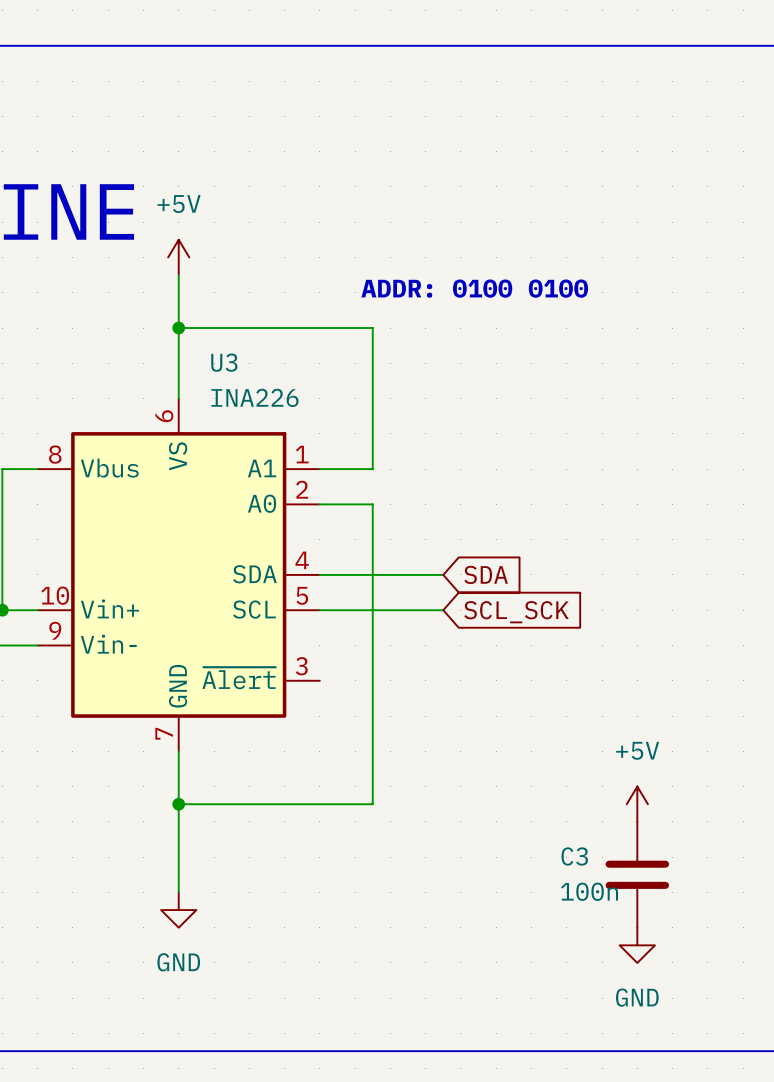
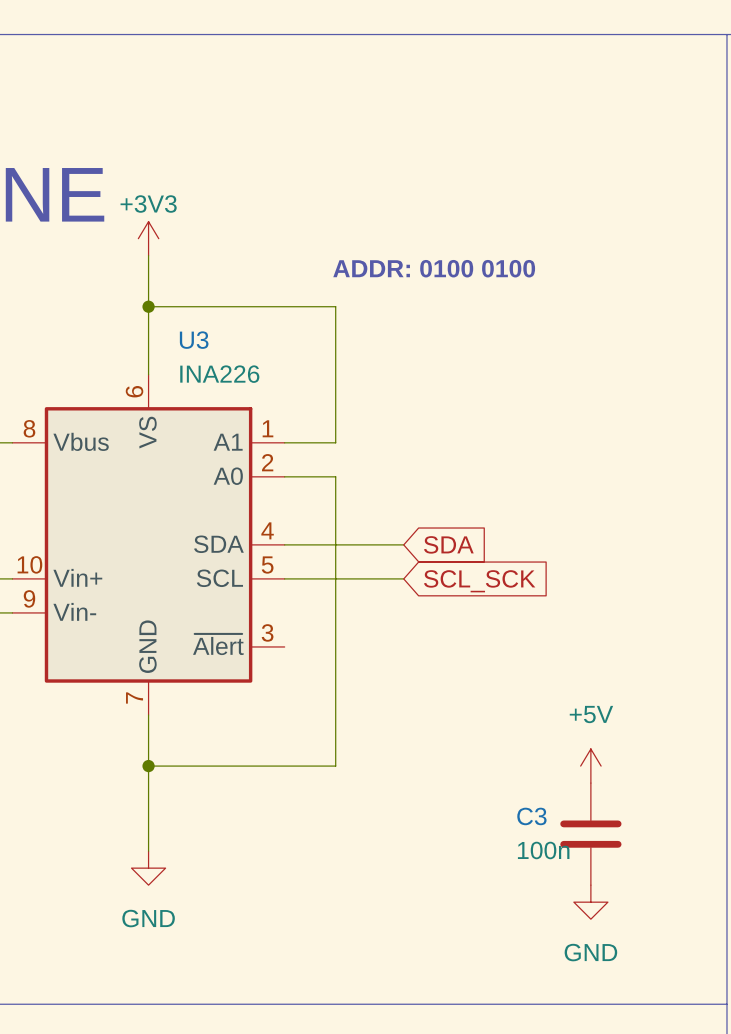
power symbol: +5V (178, 257) -> +3V3 (148, 238)

